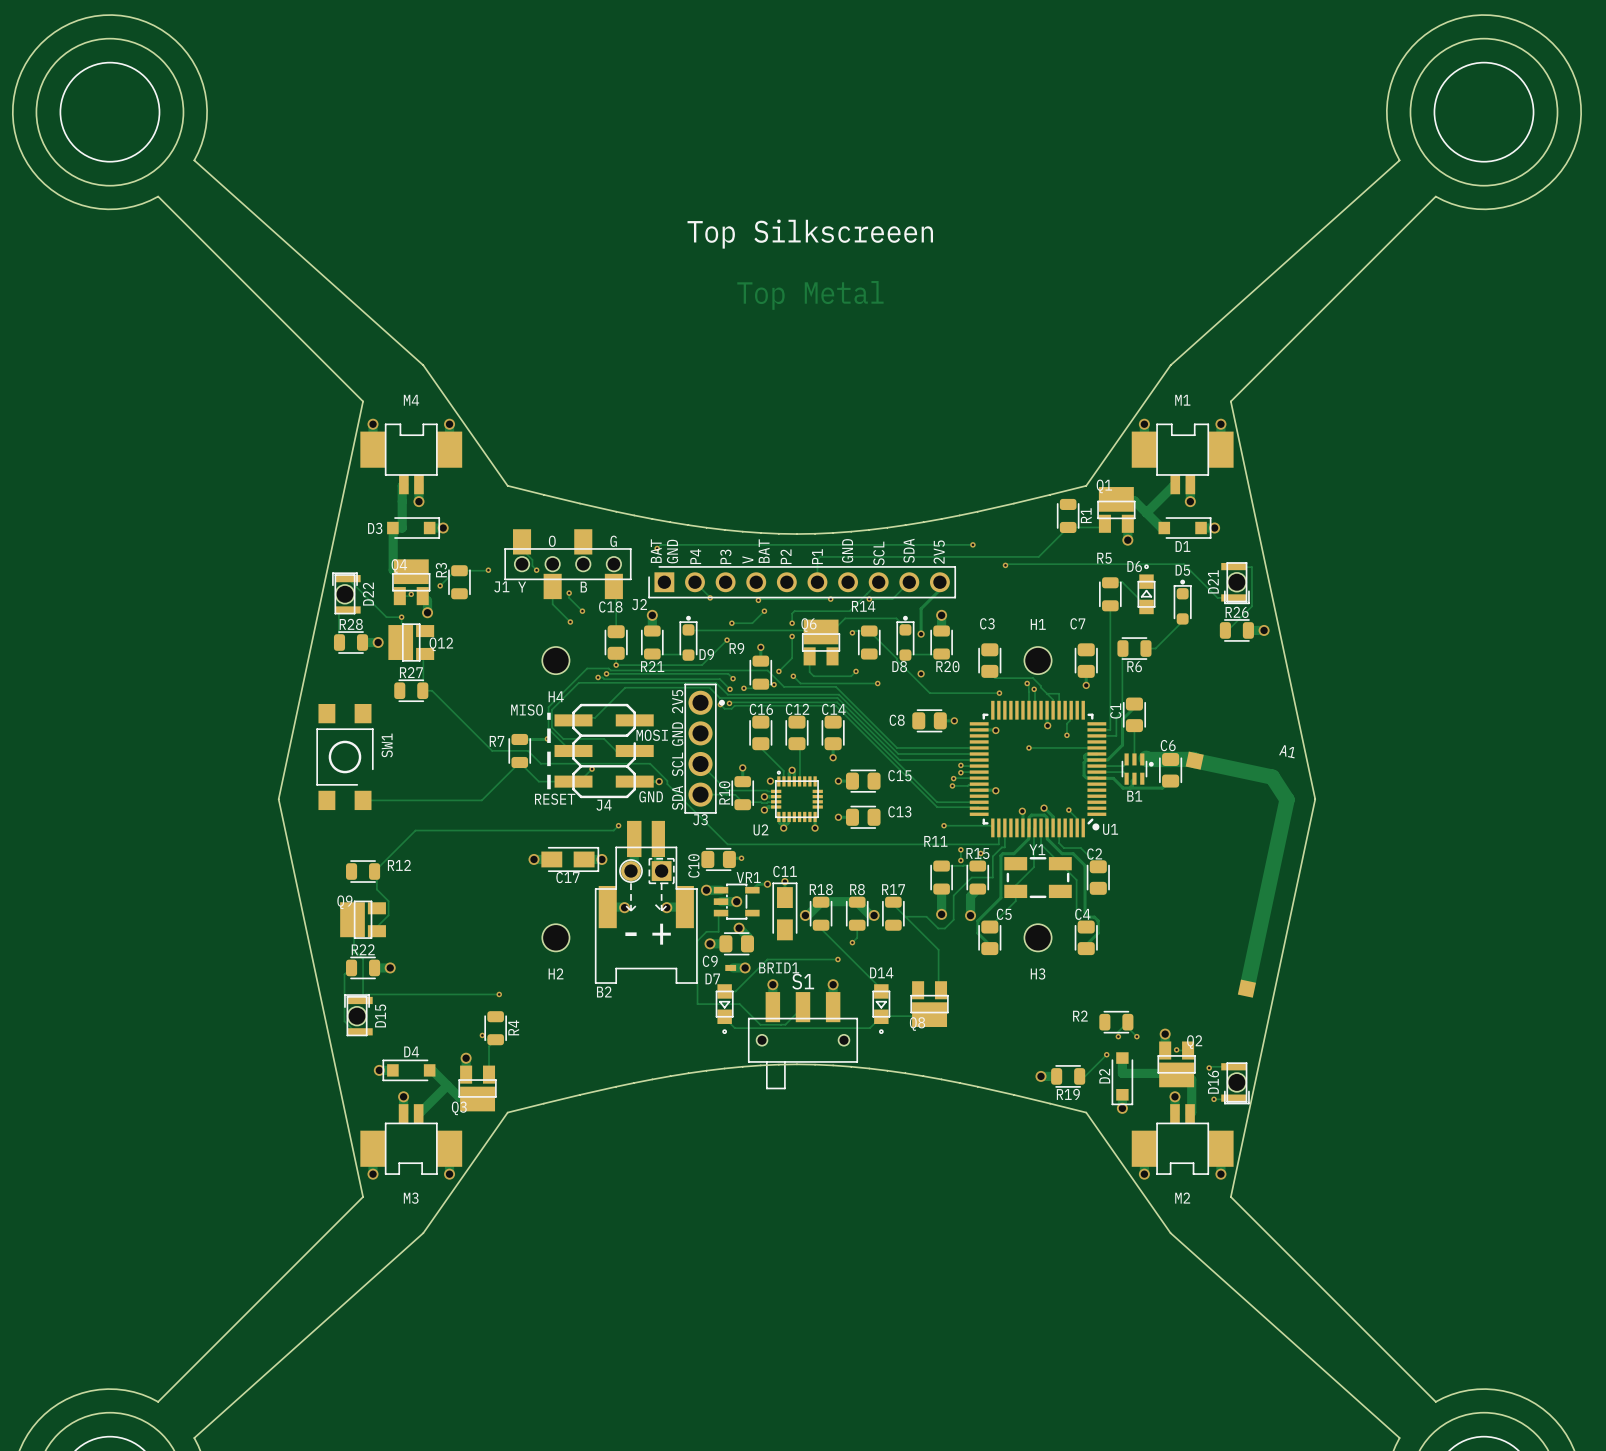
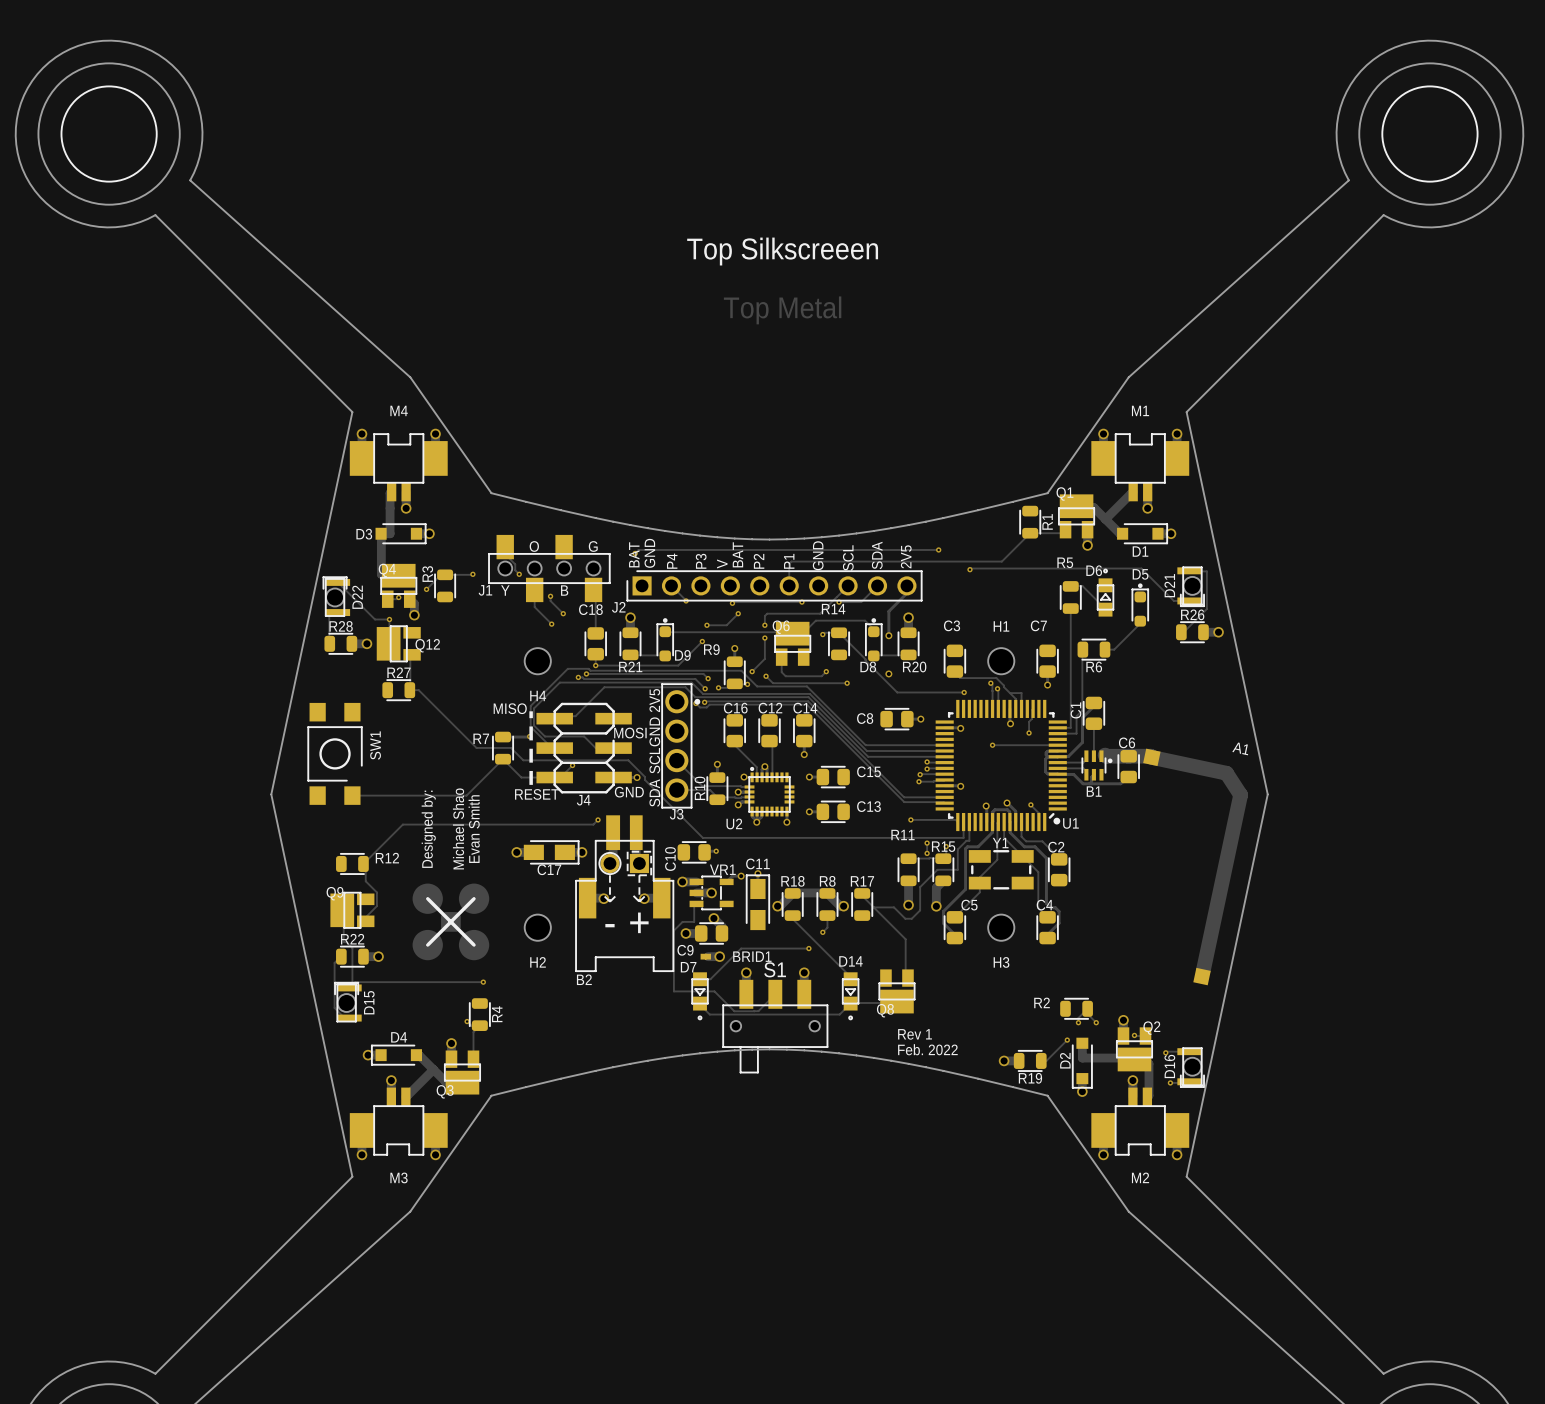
text: none -> Michael Shao (458, 828)
text: none -> Evan Smith (474, 829)
text: none -> Designed by: (428, 829)
drawing: none -> [412, 883, 490, 961]
text: none -> Rev 1 (915, 1034)
text: none -> Feb. 2022 (927, 1049)

